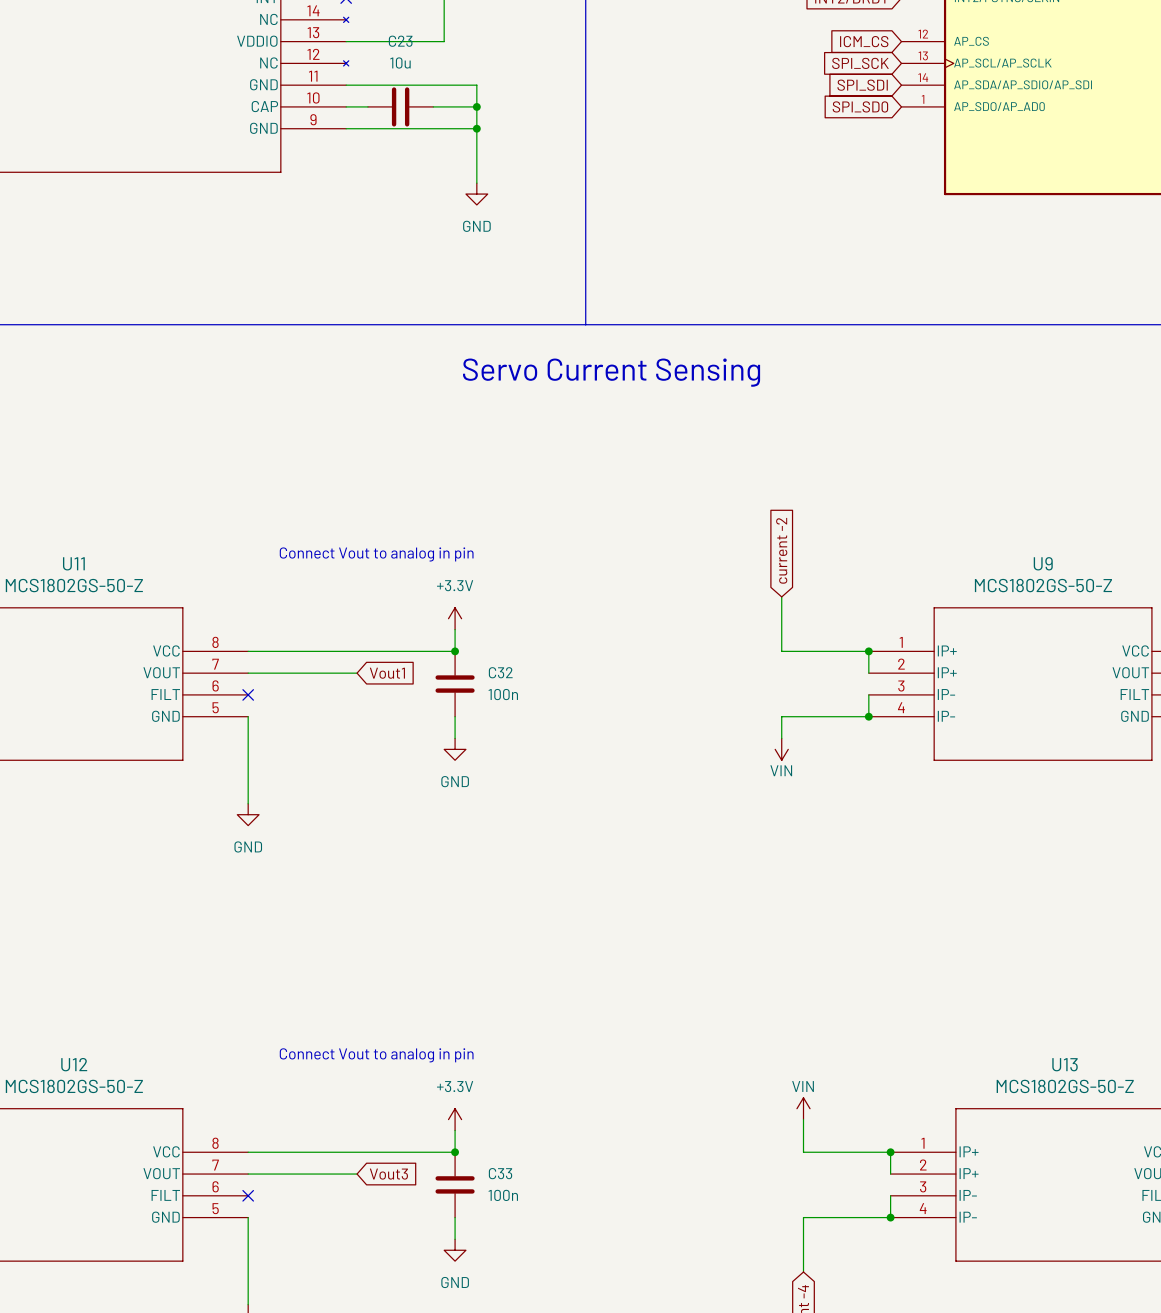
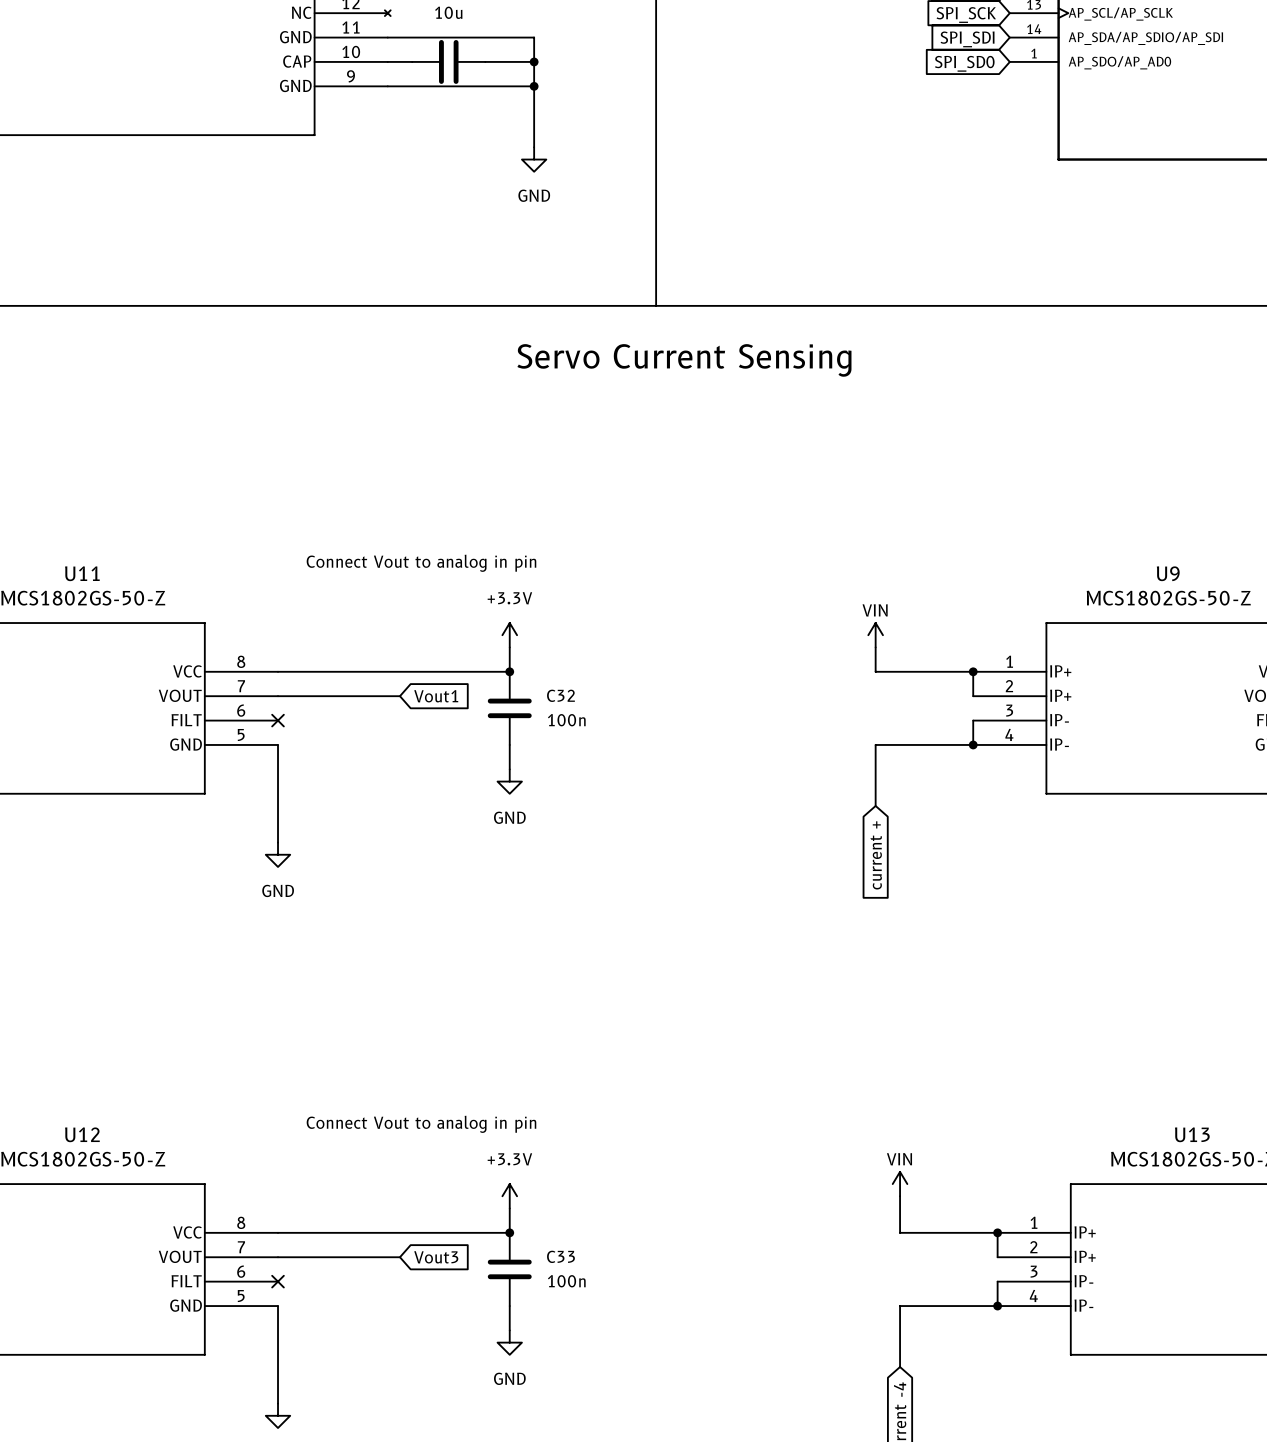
global label: current -2 (781, 550) -> none
power symbol rotation: 0° (781, 749) -> 180° (875, 635)
power symbol position: VIN (781, 749) -> VIN (875, 635)
global label: none -> current + (876, 855)

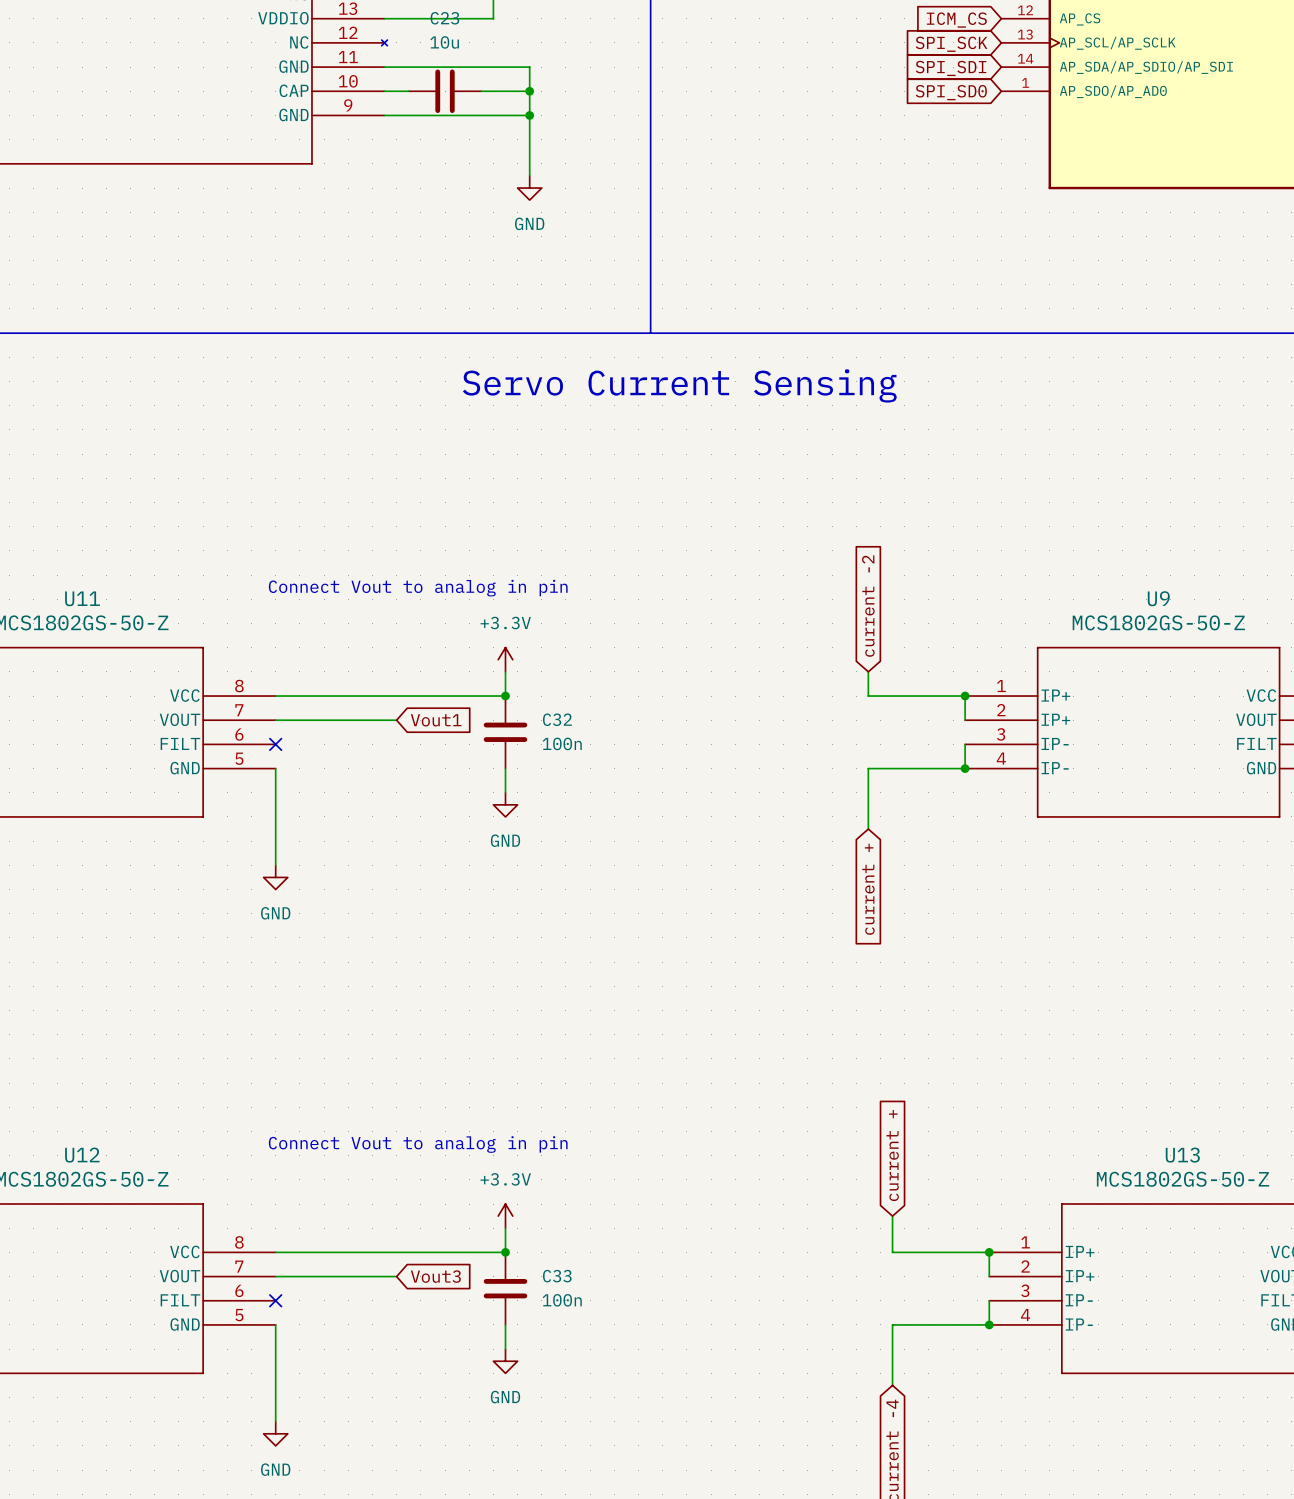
global label: none -> current -2 (868, 606)
power symbol: VIN (875, 635) -> none
global label: none -> current + (892, 1155)
power symbol: VIN (900, 1184) -> none

